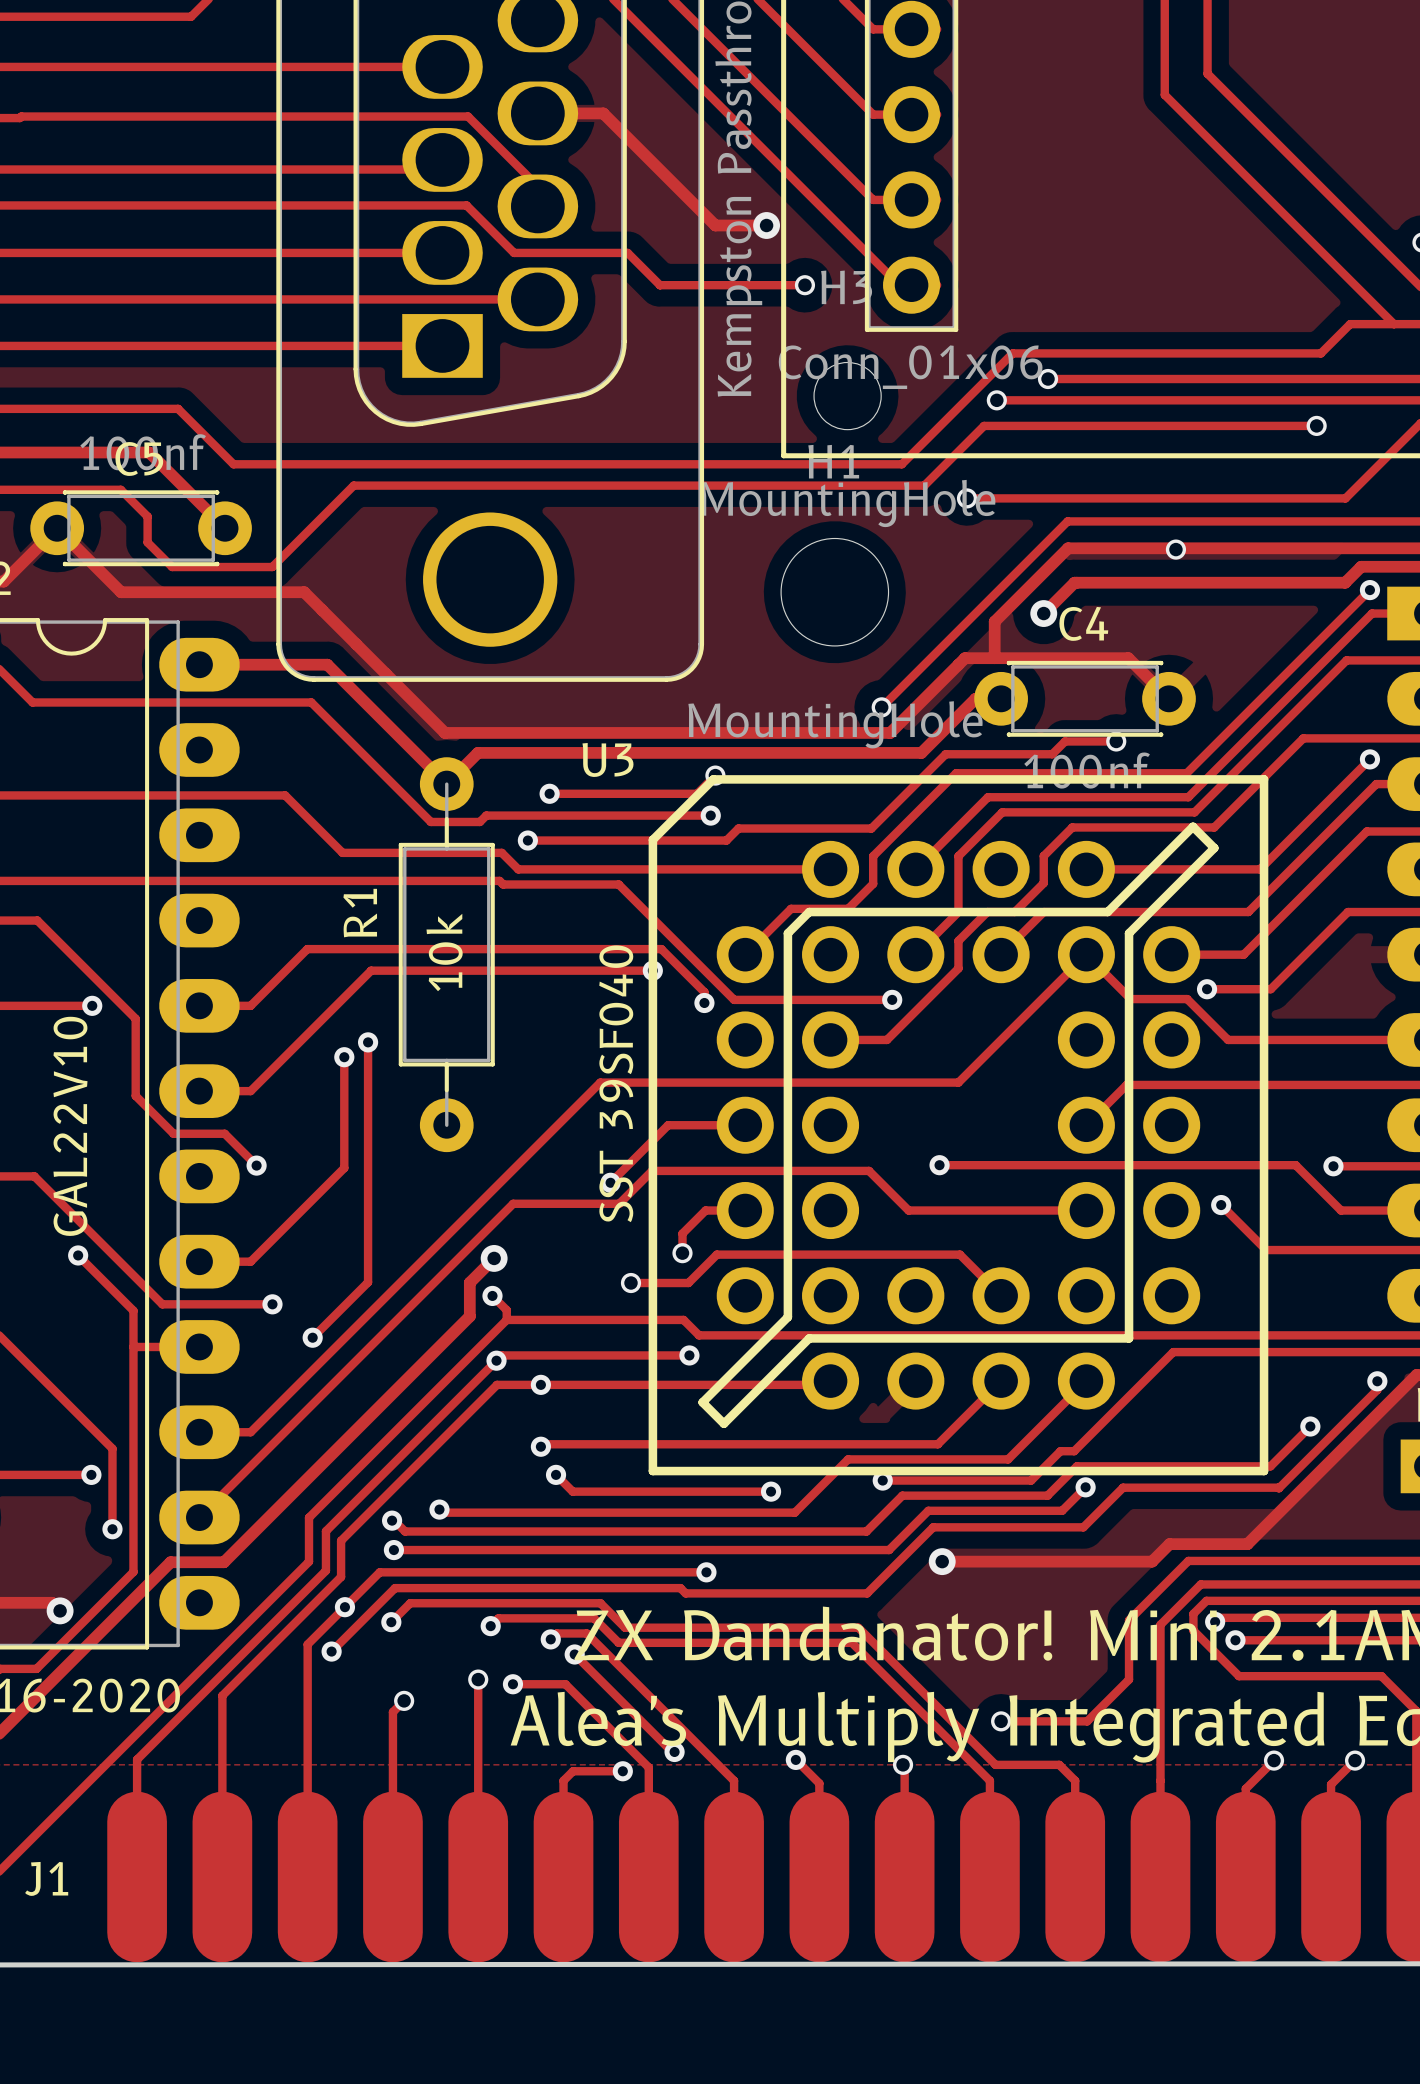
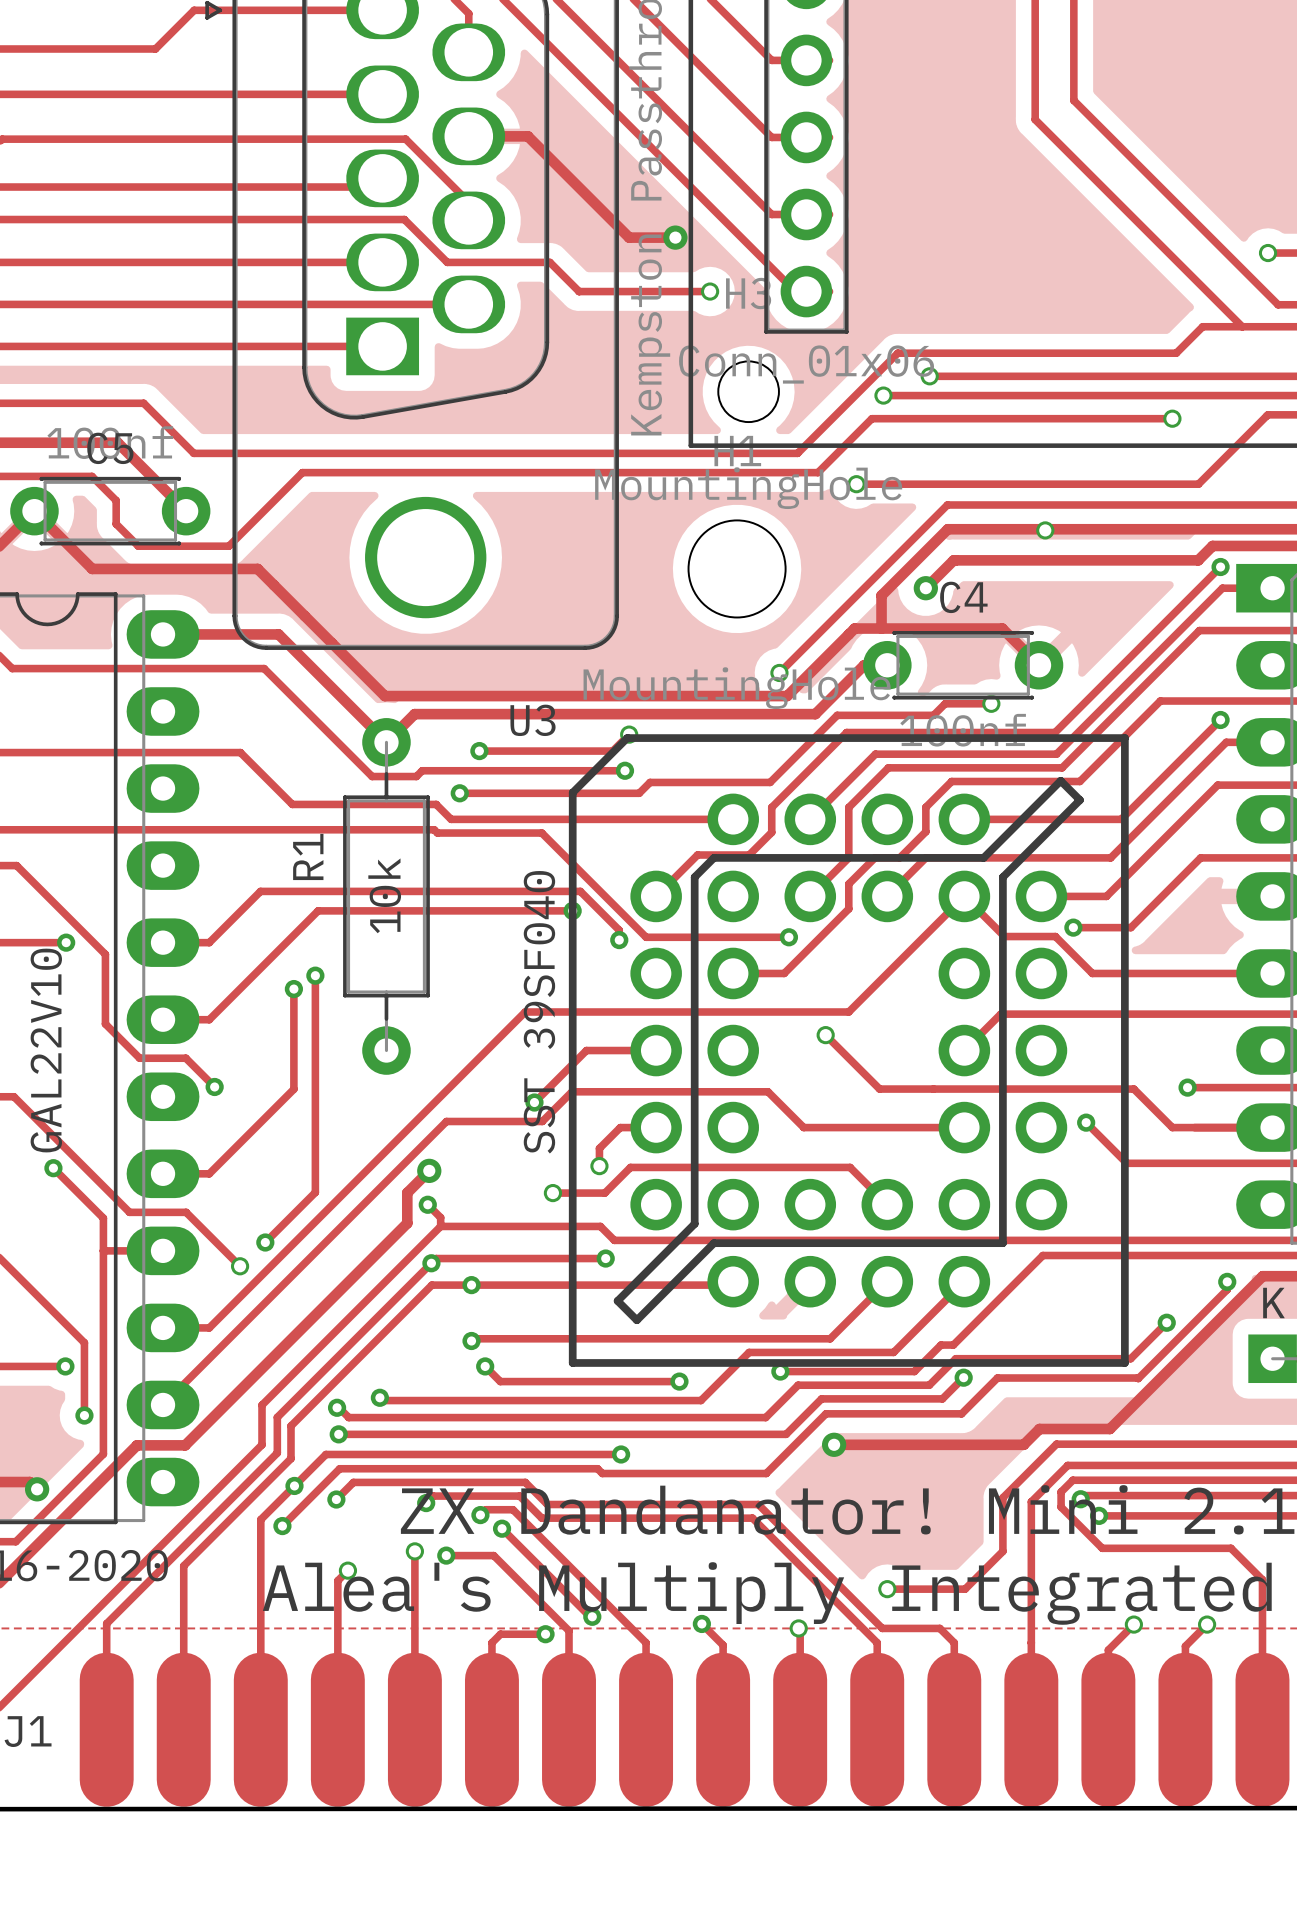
via: none -> (825, 1035)
track: (939, 1165) (1295, 1165) (1341, 1210) -> (825, 1035) (879, 1089) (1133, 1089) (1172, 1127) (1194, 1127)
via: (939, 1165) -> none
track: (225, 1304) (272, 1304) -> (186, 1212) (240, 1266)
via: (272, 1304) -> none
via: none -> (240, 1266)

